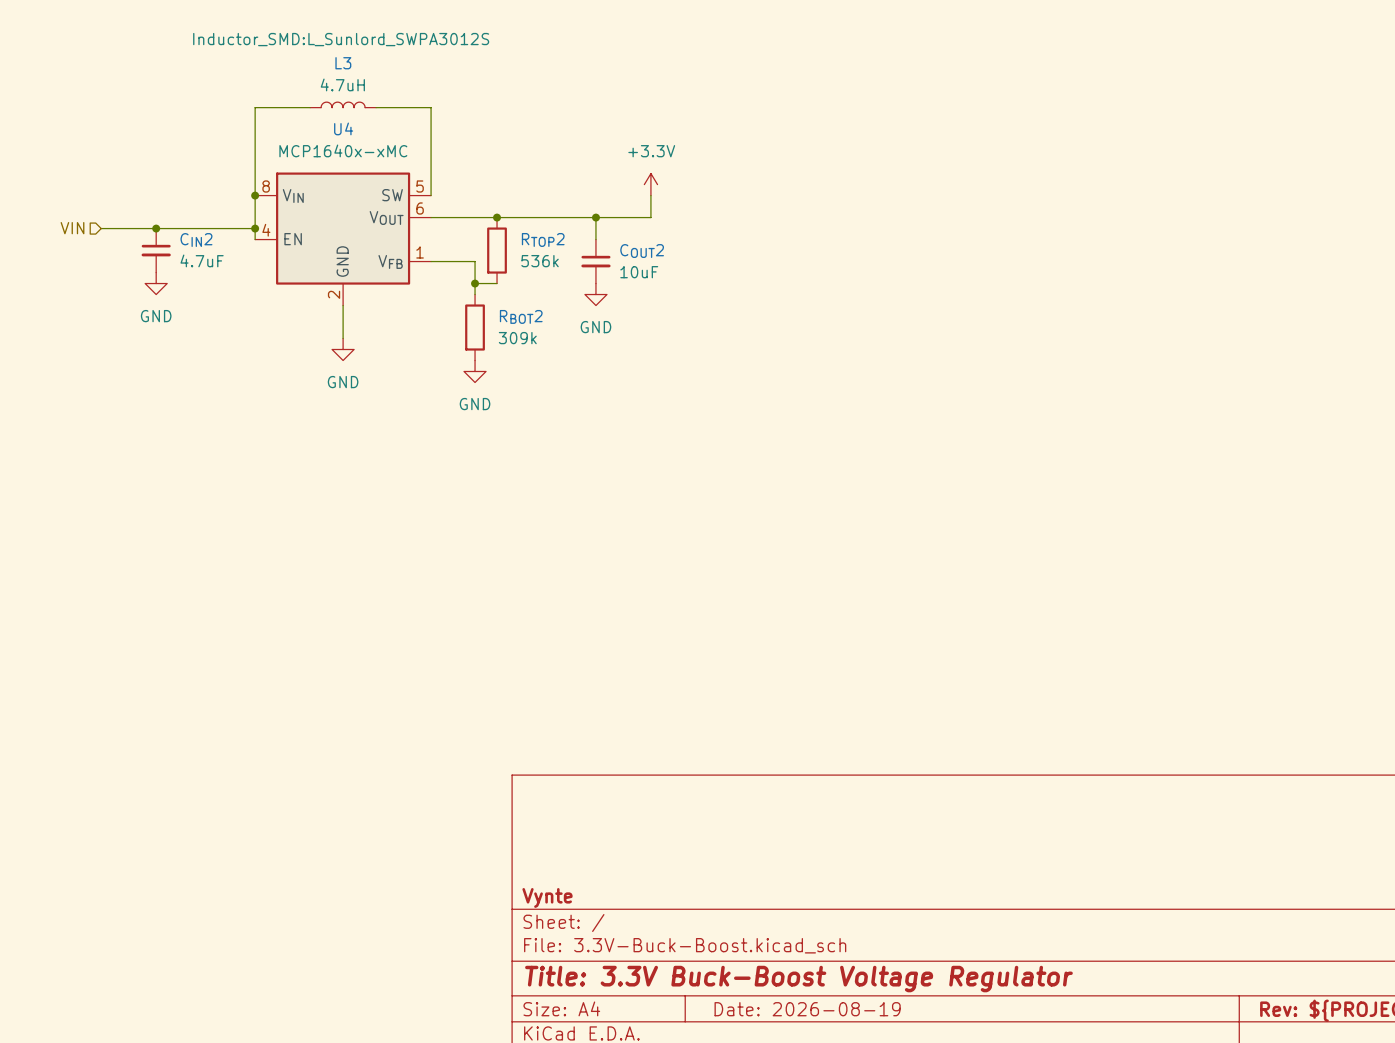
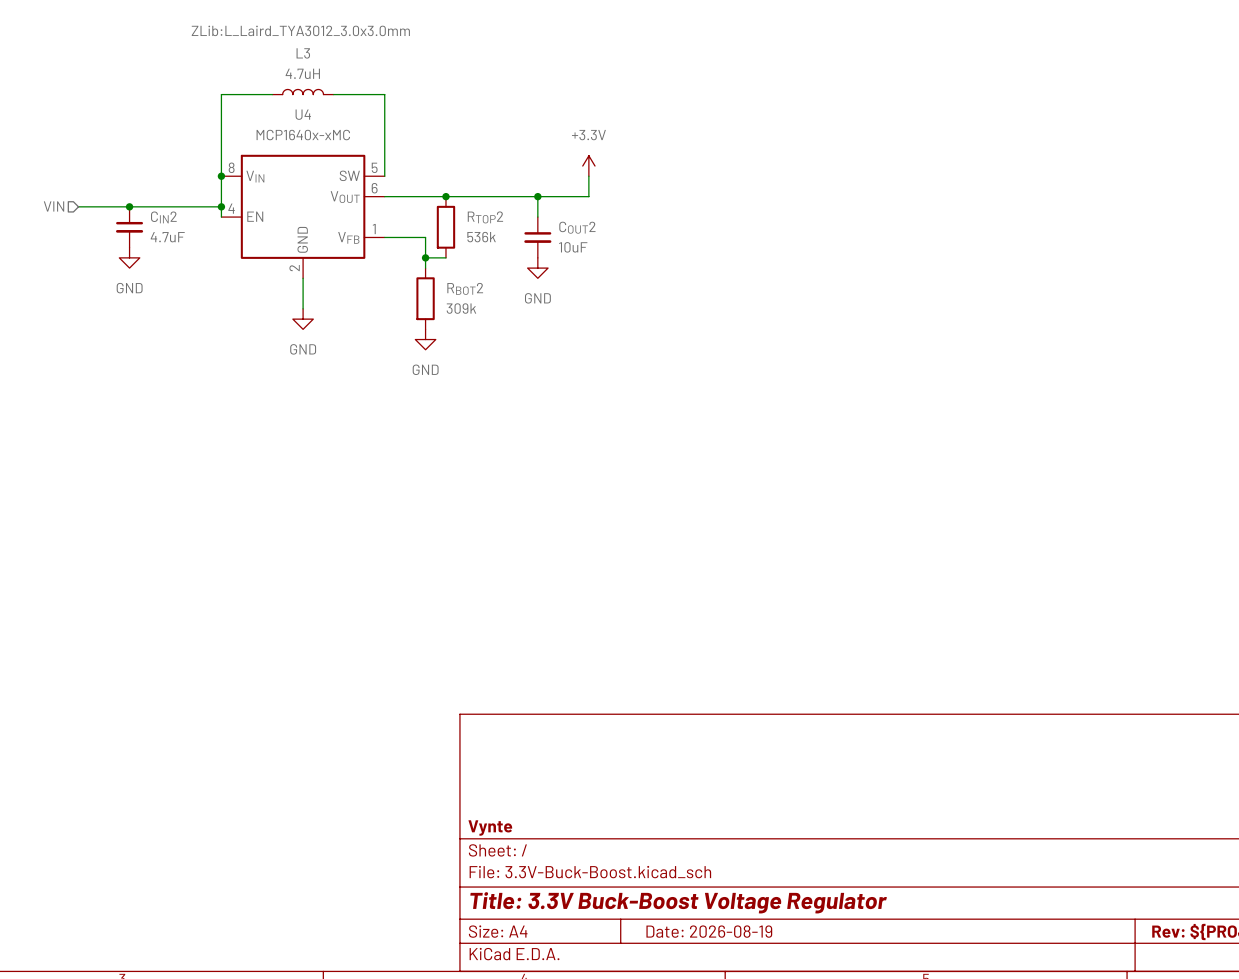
L3 text: Inductor_SMD:L_Sunlord_SWPA3012S (341, 39) -> ZLib:L_Laird_TYA3012_3.0x3.0mm (300, 30)

